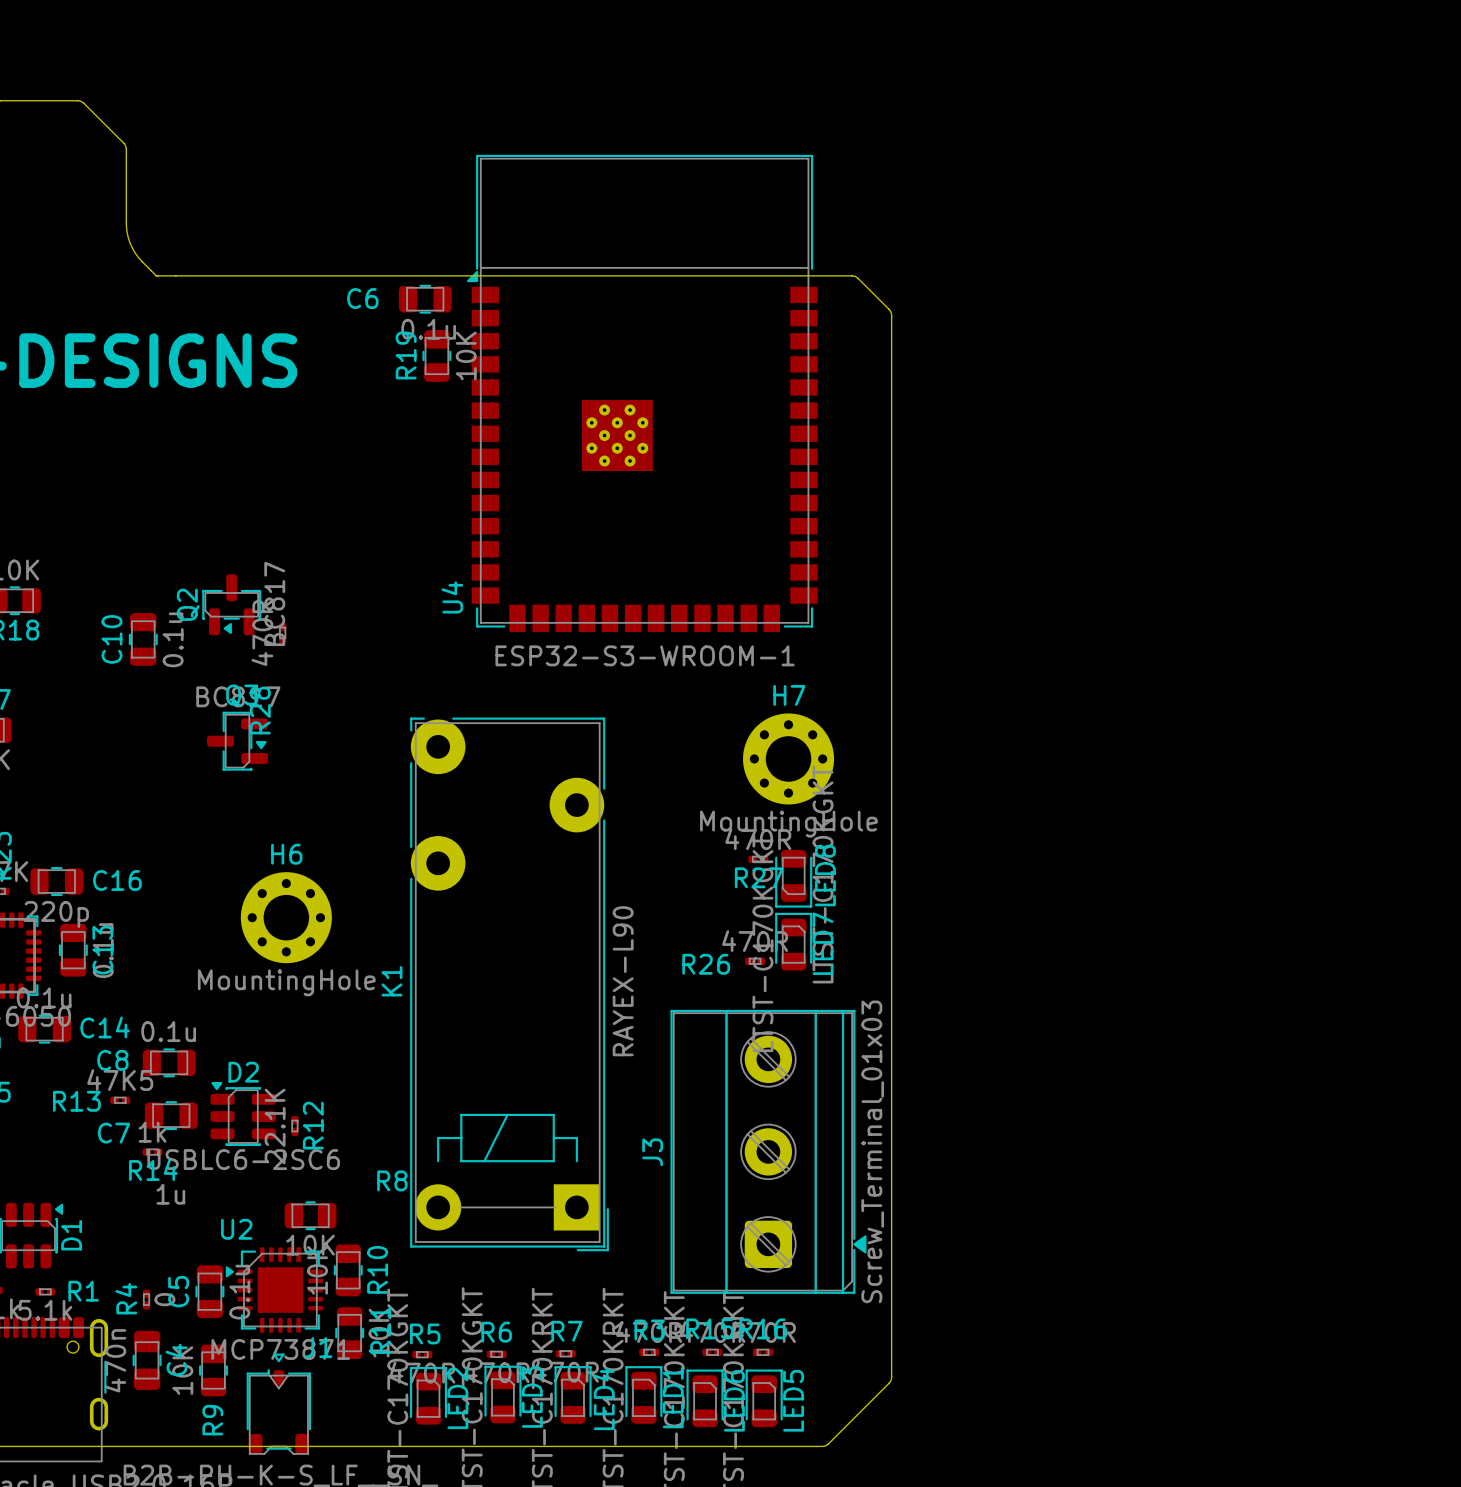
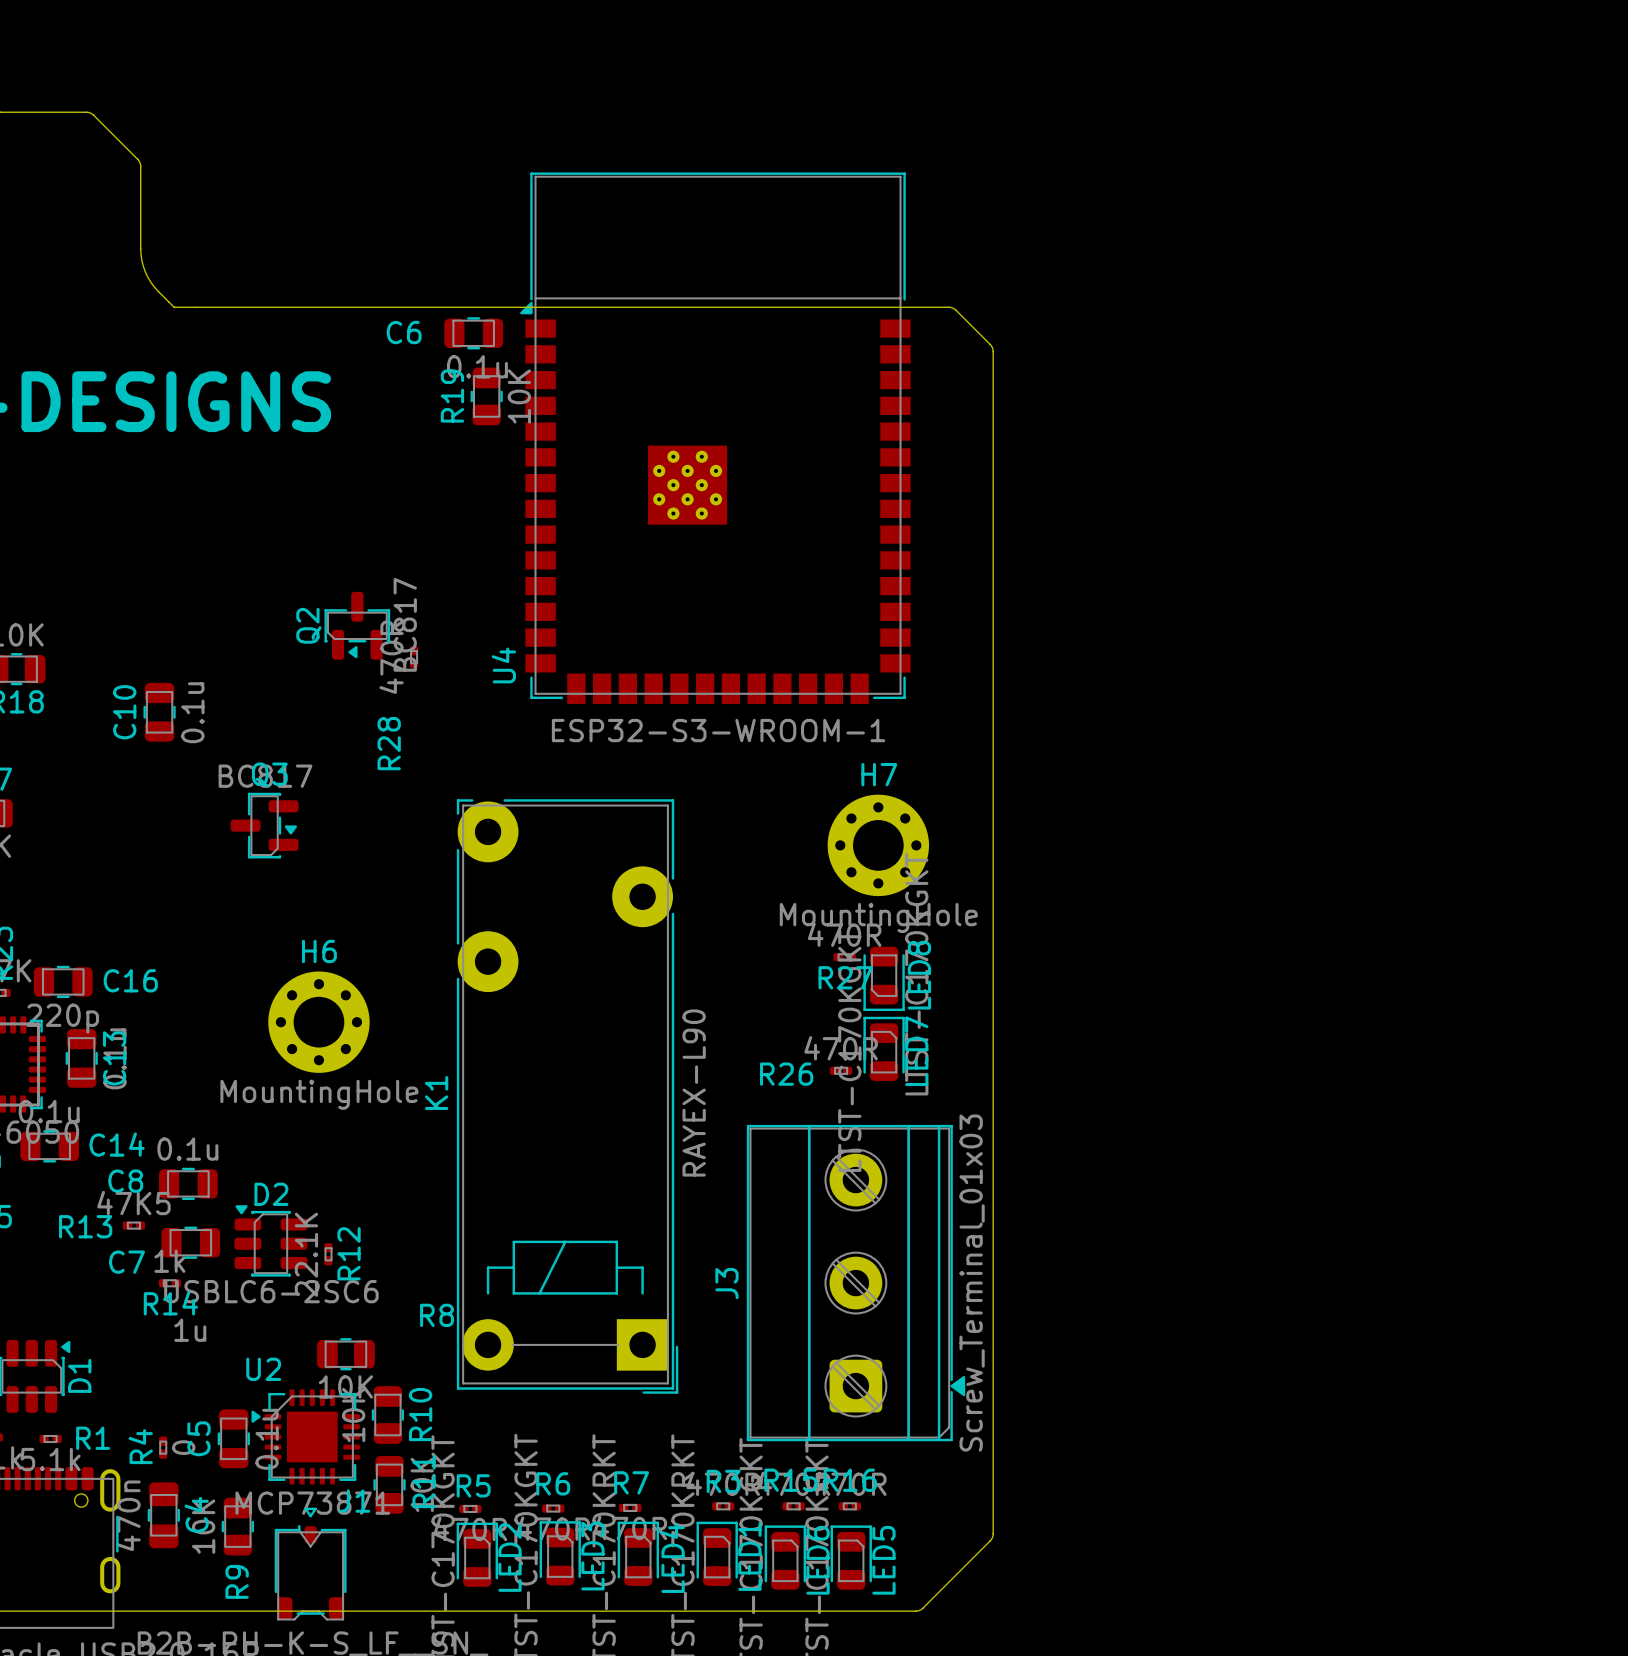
Q2 position: (231, 604) -> (357, 625)
R28 position: (282, 632) -> (414, 657)

